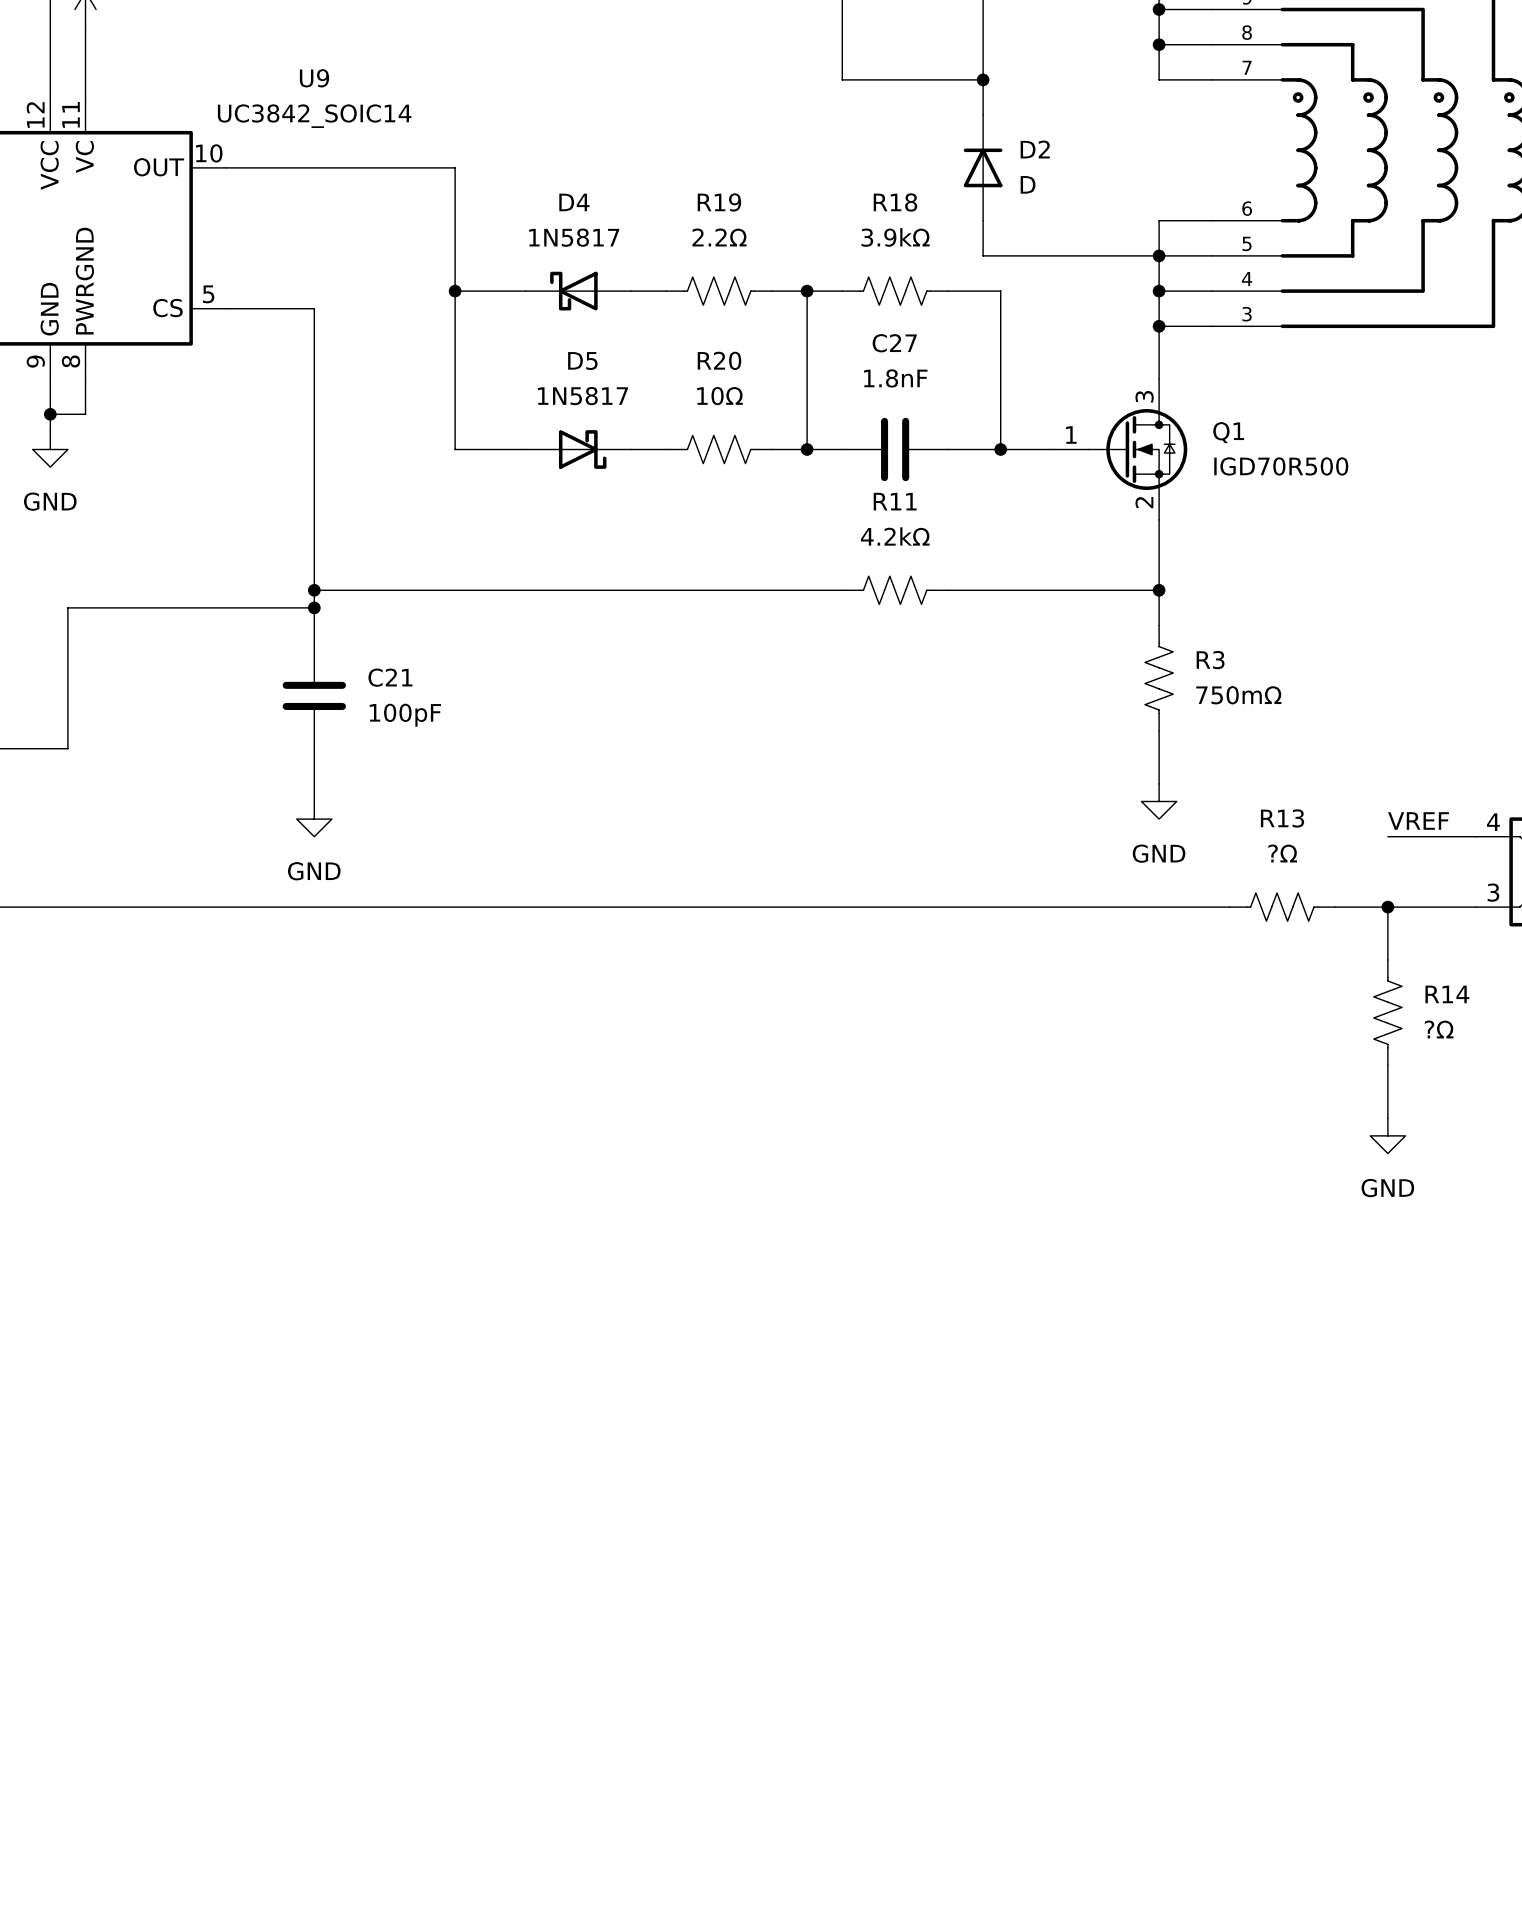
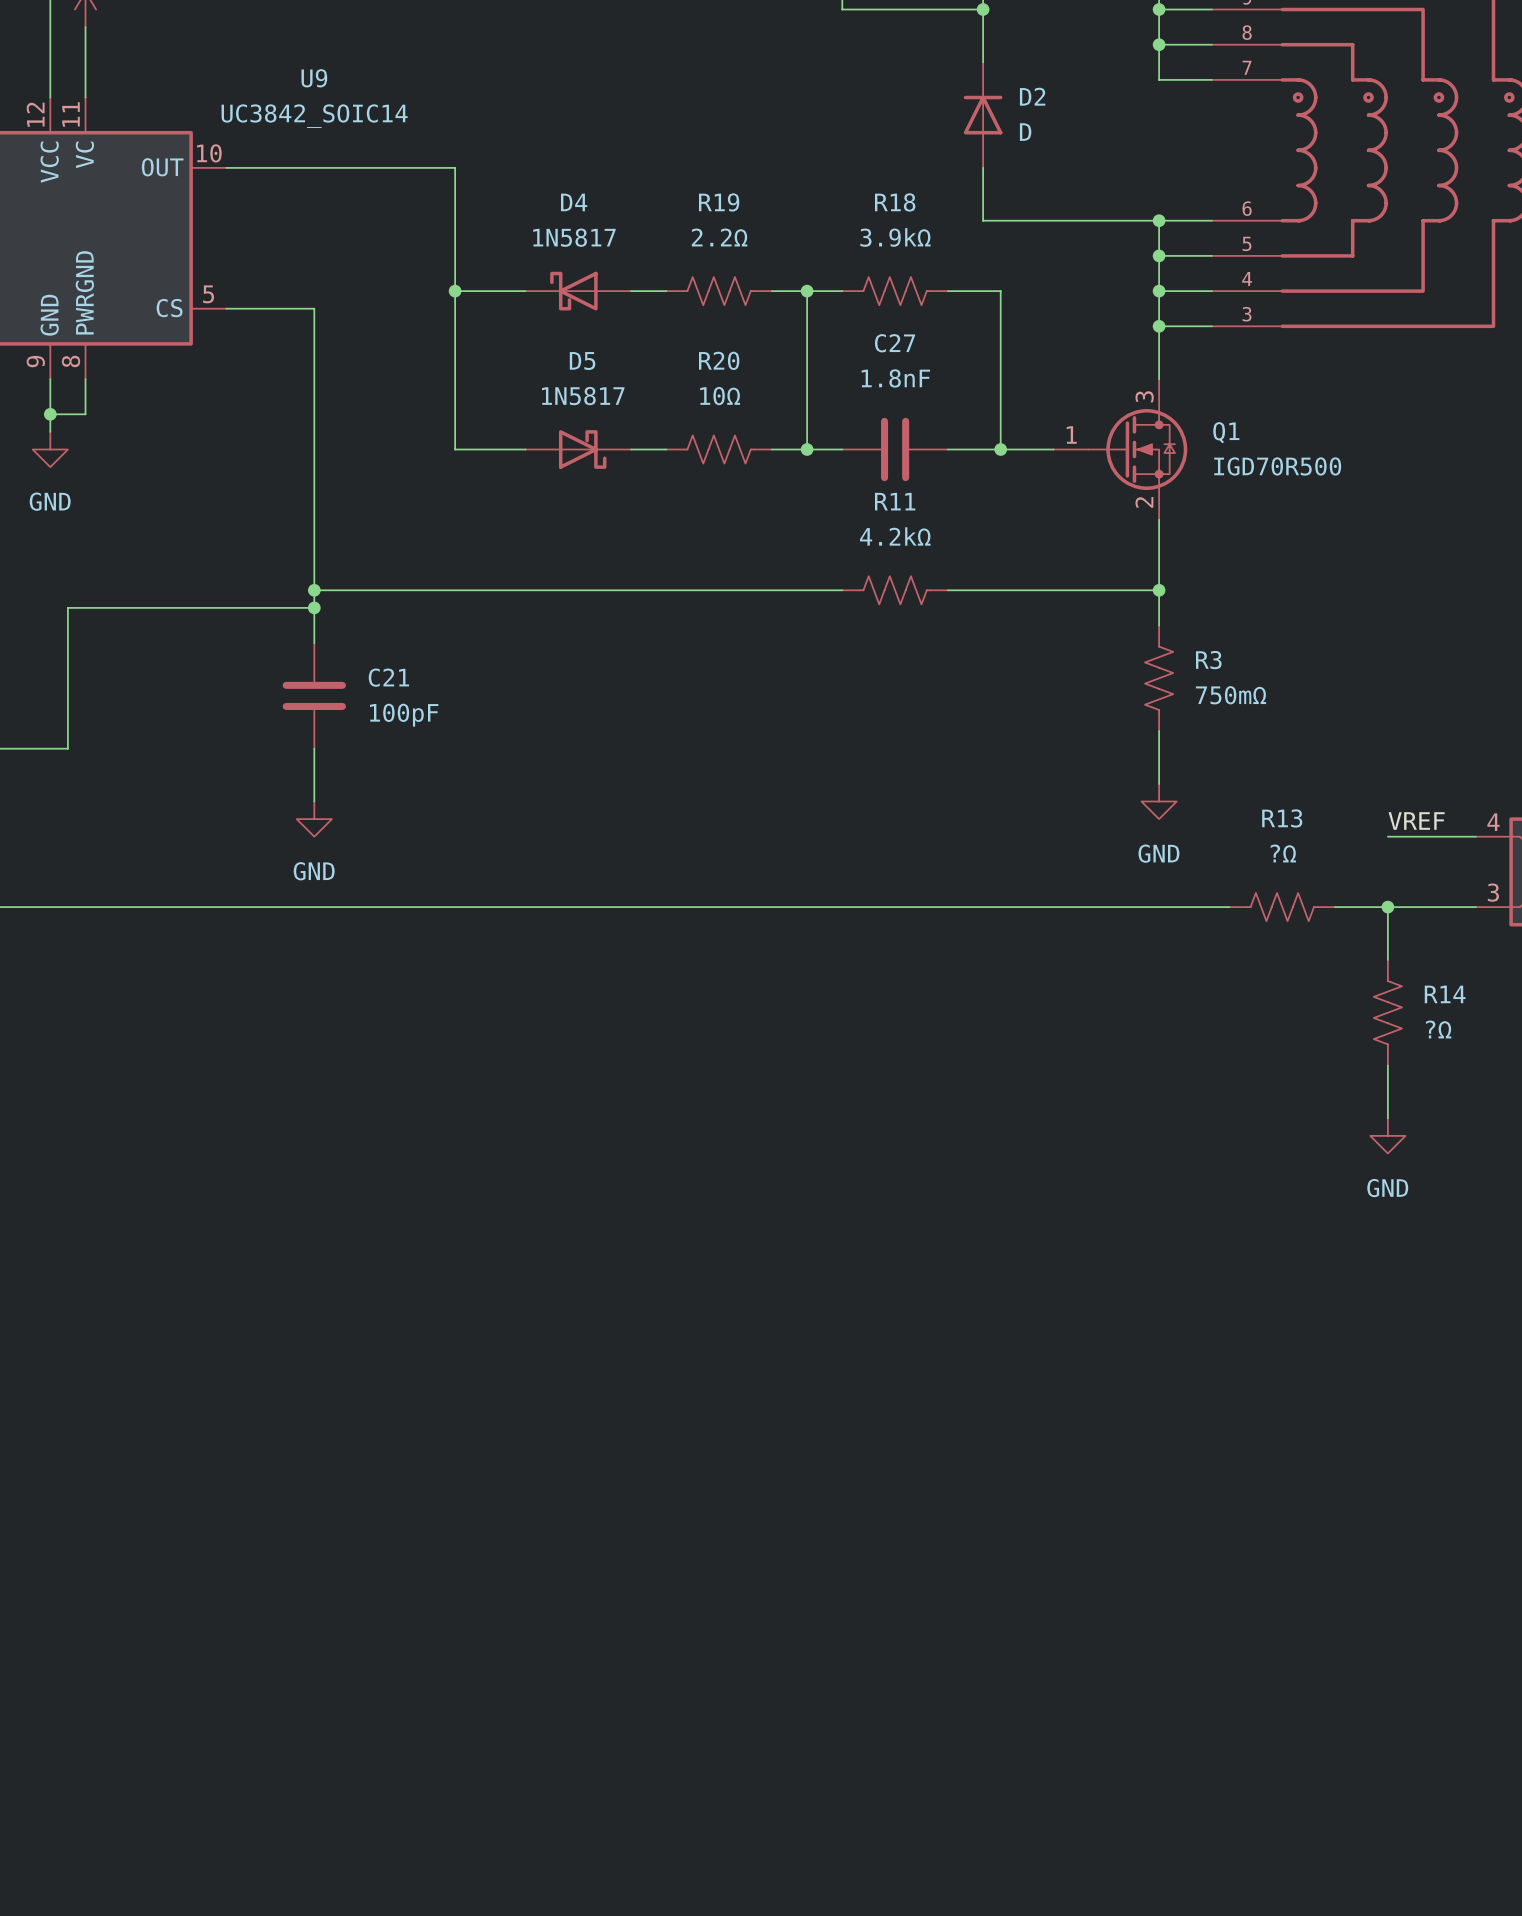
wire: (842, 9) (842, 79) (983, 79) -> (842, 9) (983, 9)
junction position: (983, 79) -> (983, 9)
wire: none -> (983, 167) (983, 220) (1159, 220)
D2 position: (983, 167) -> (983, 115)
wire: (983, 220) (983, 255) (1159, 255) -> none
junction: none -> (1159, 220)

